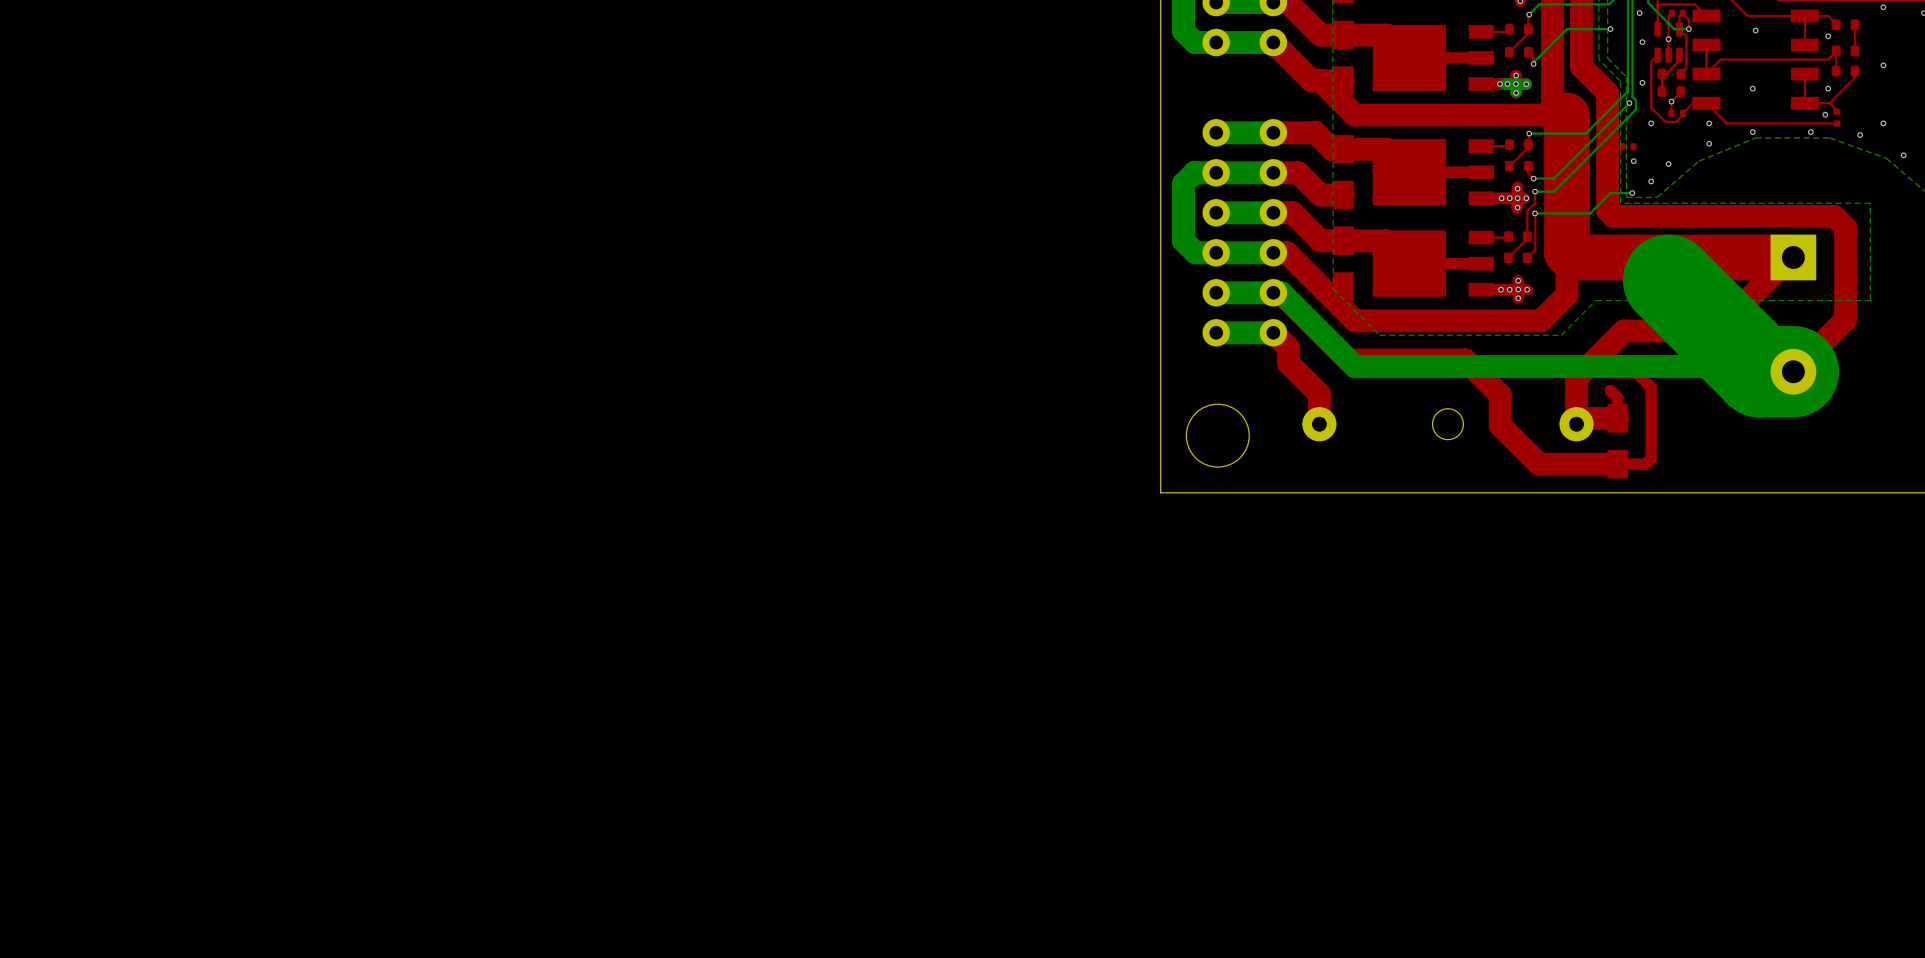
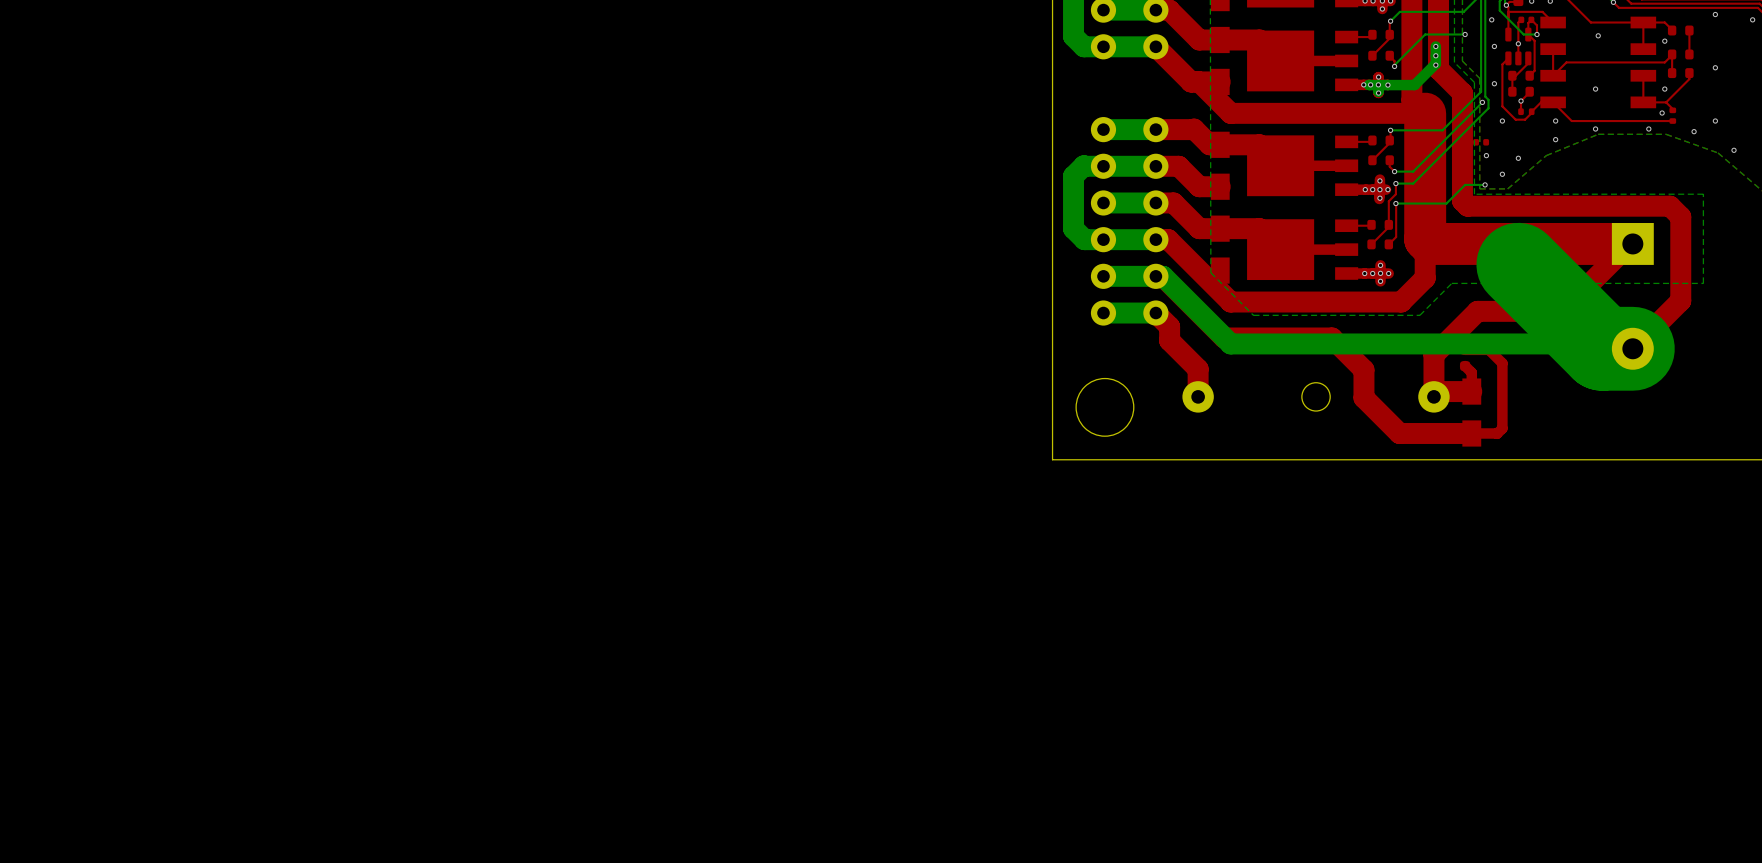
bottom track: none -> (1435, 46) (1435, 63) (1414, 85) (1387, 85)
via: none -> (1435, 46)
via: none -> (1435, 55)
via: none -> (1435, 65)

